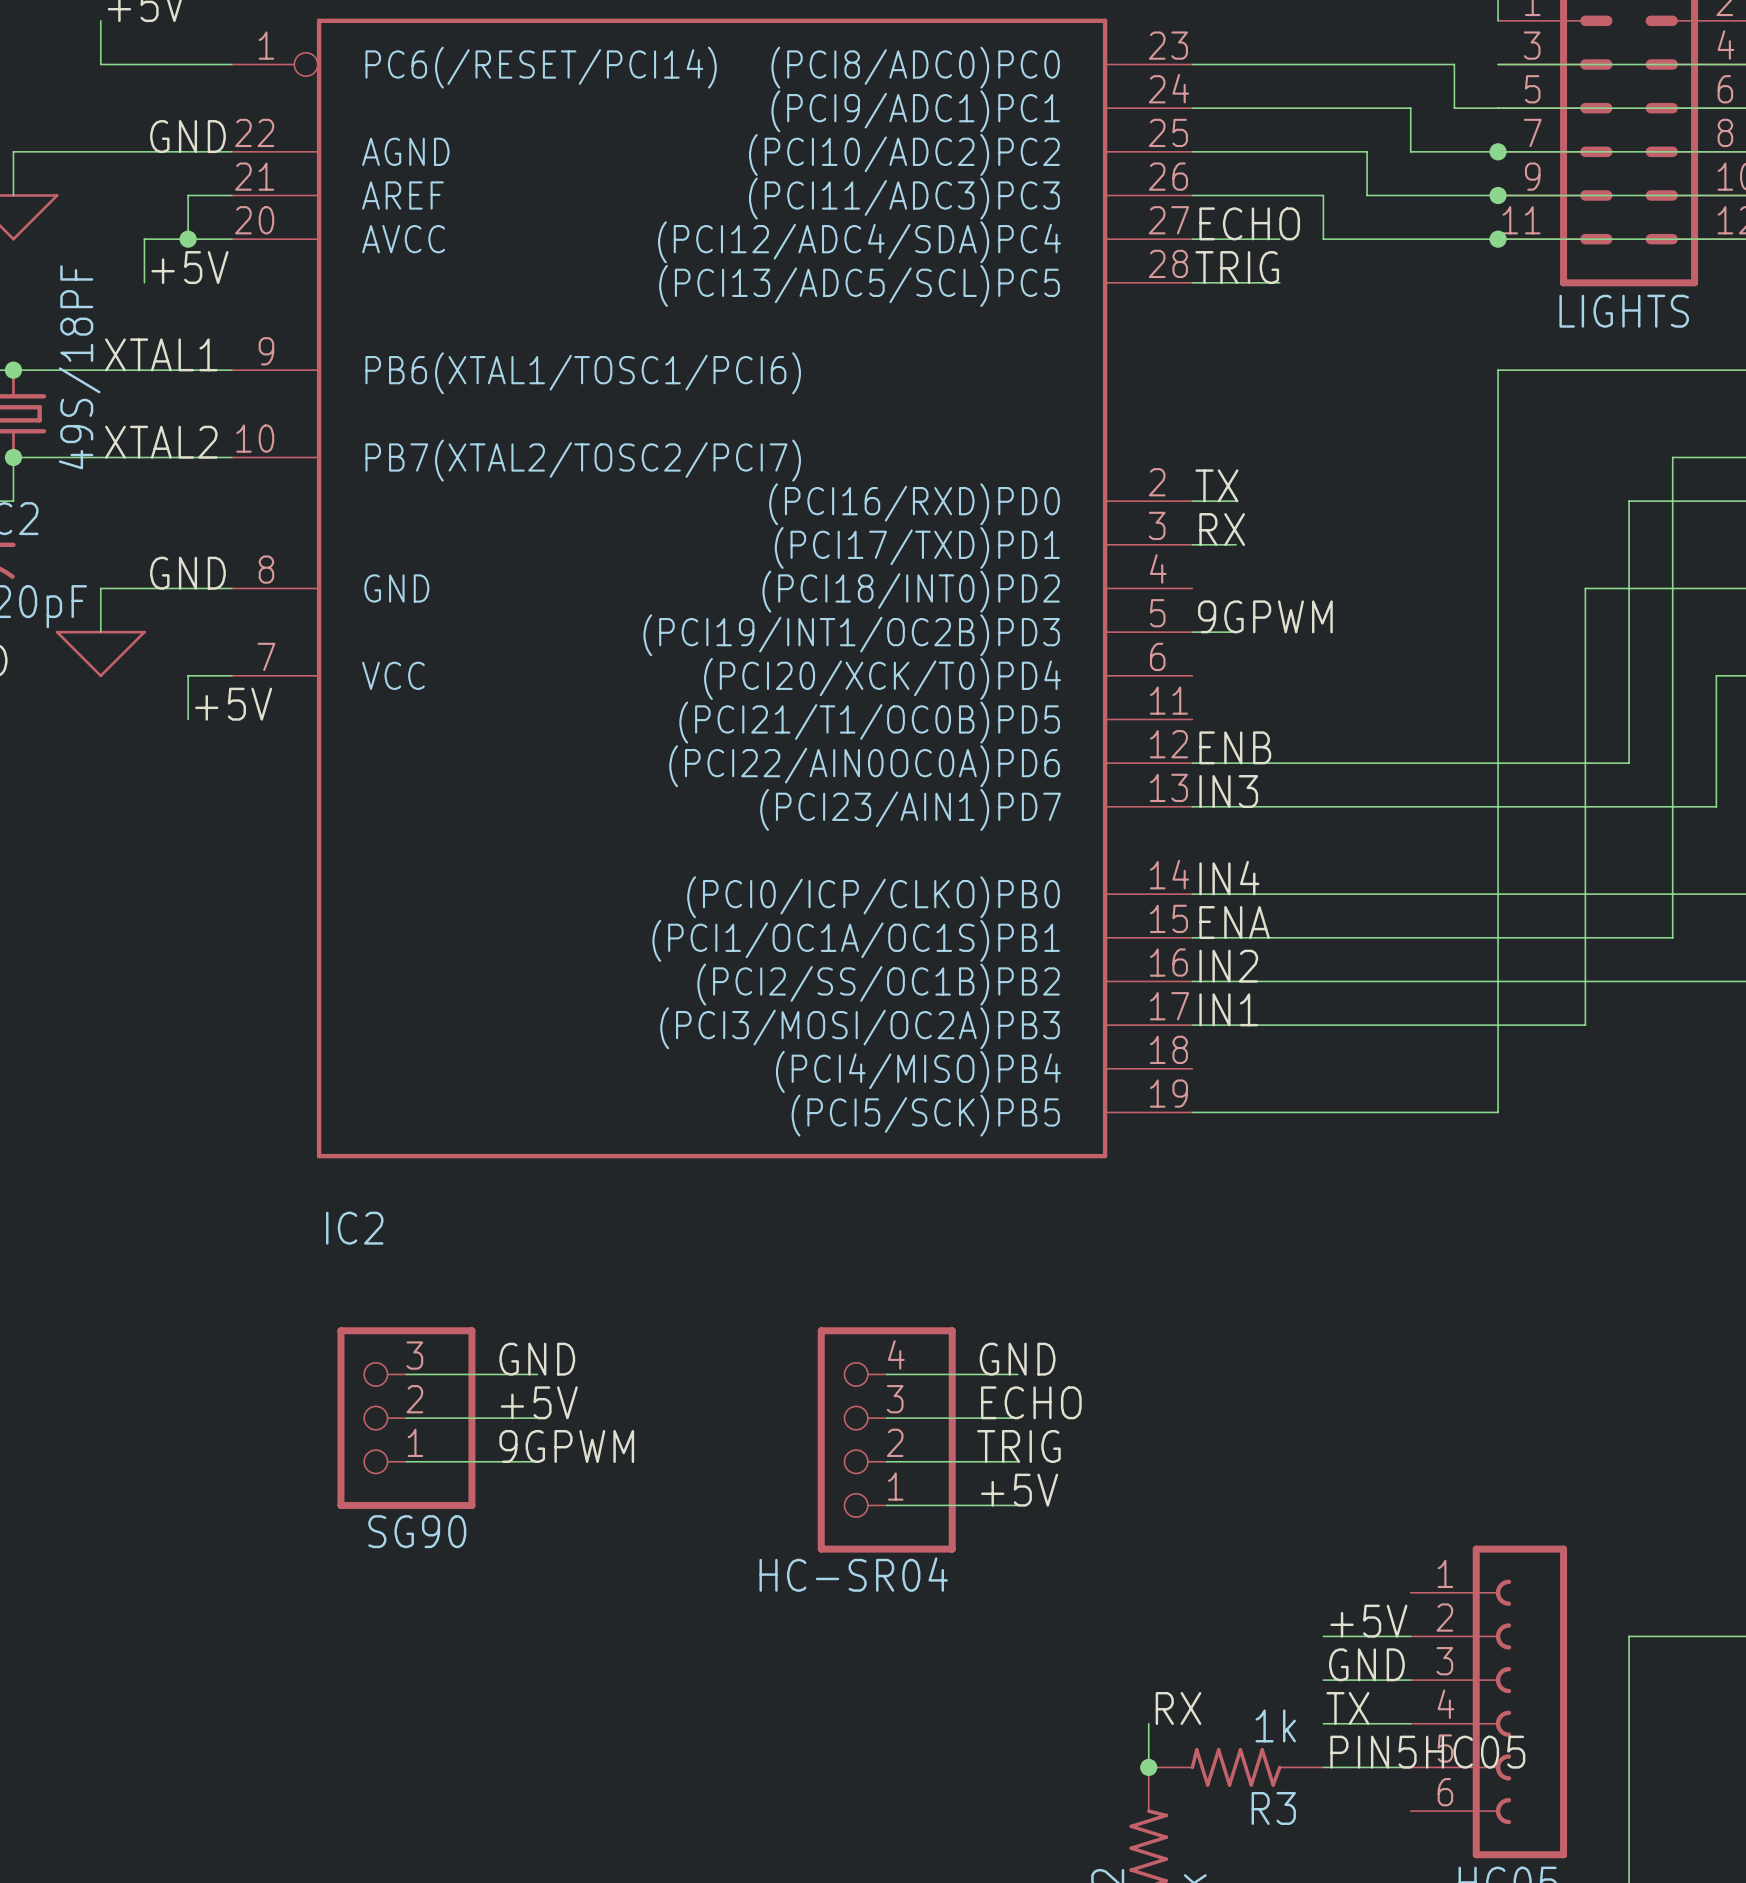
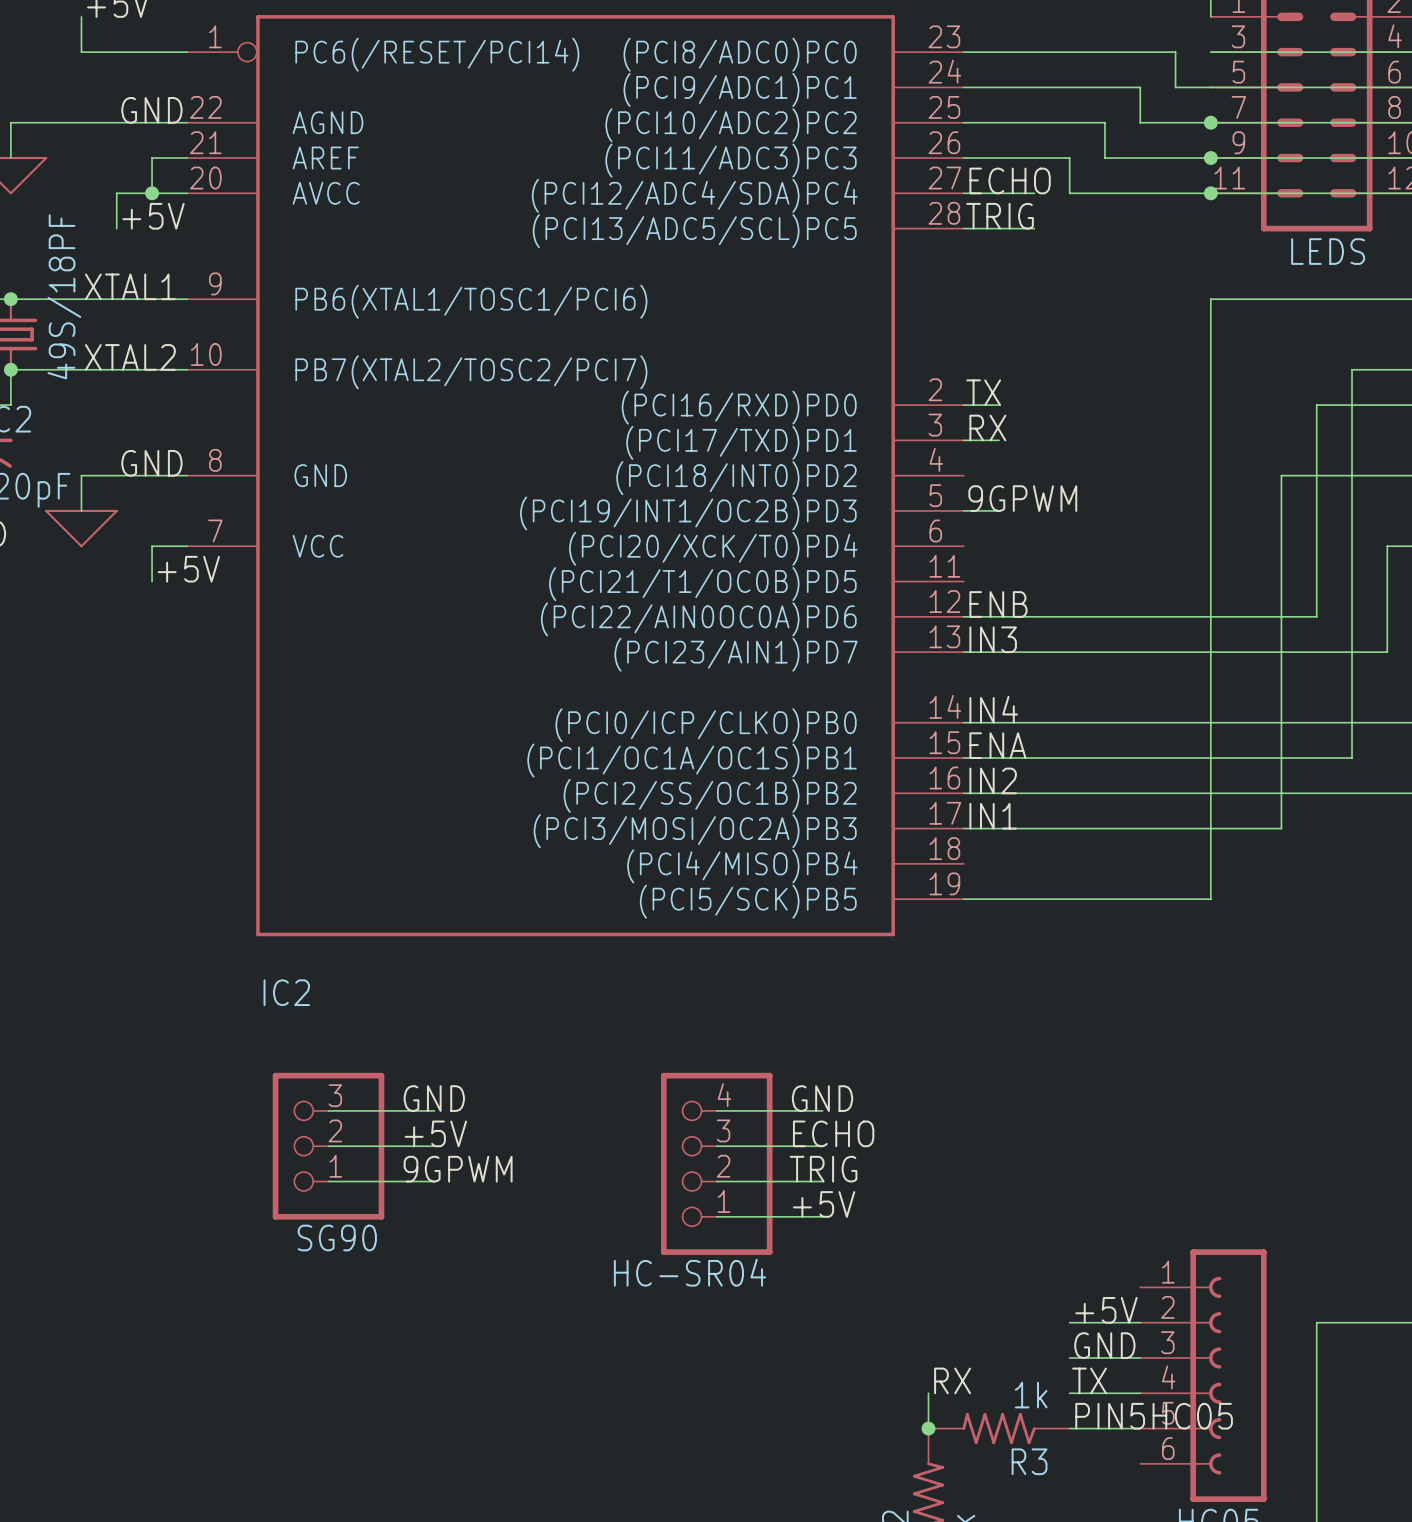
LIGHTS name: LIGHTS (1624, 311) -> LEDS (1328, 251)

